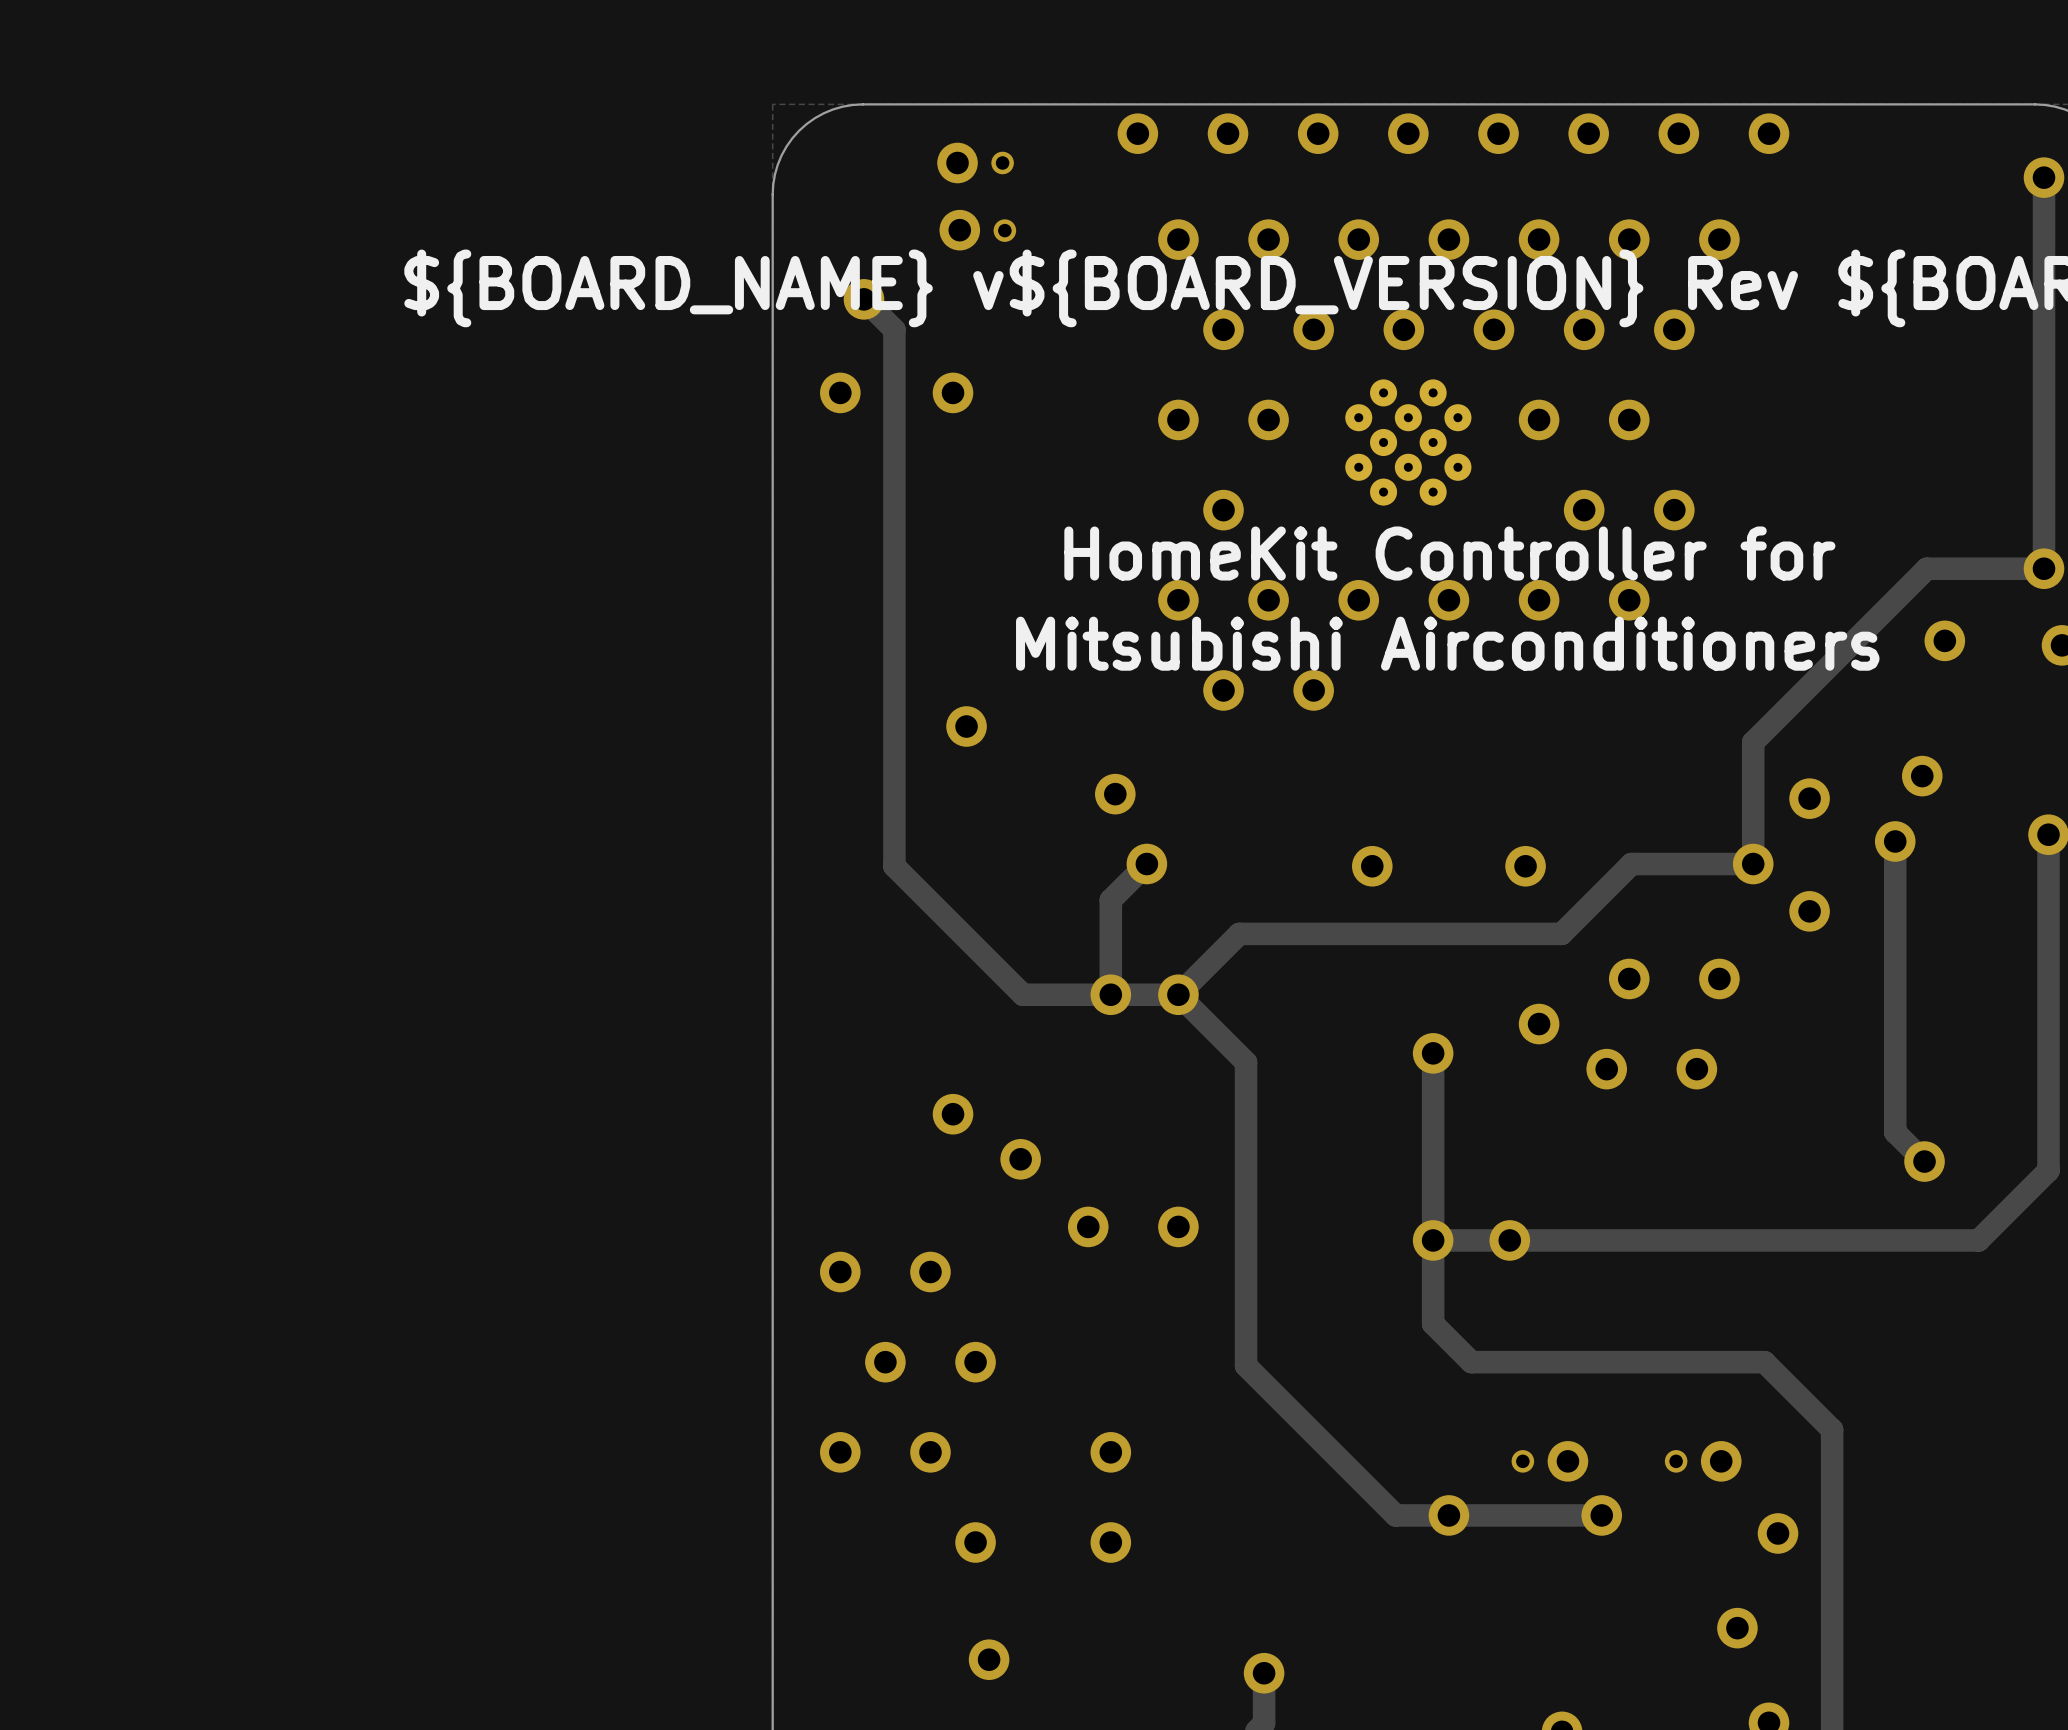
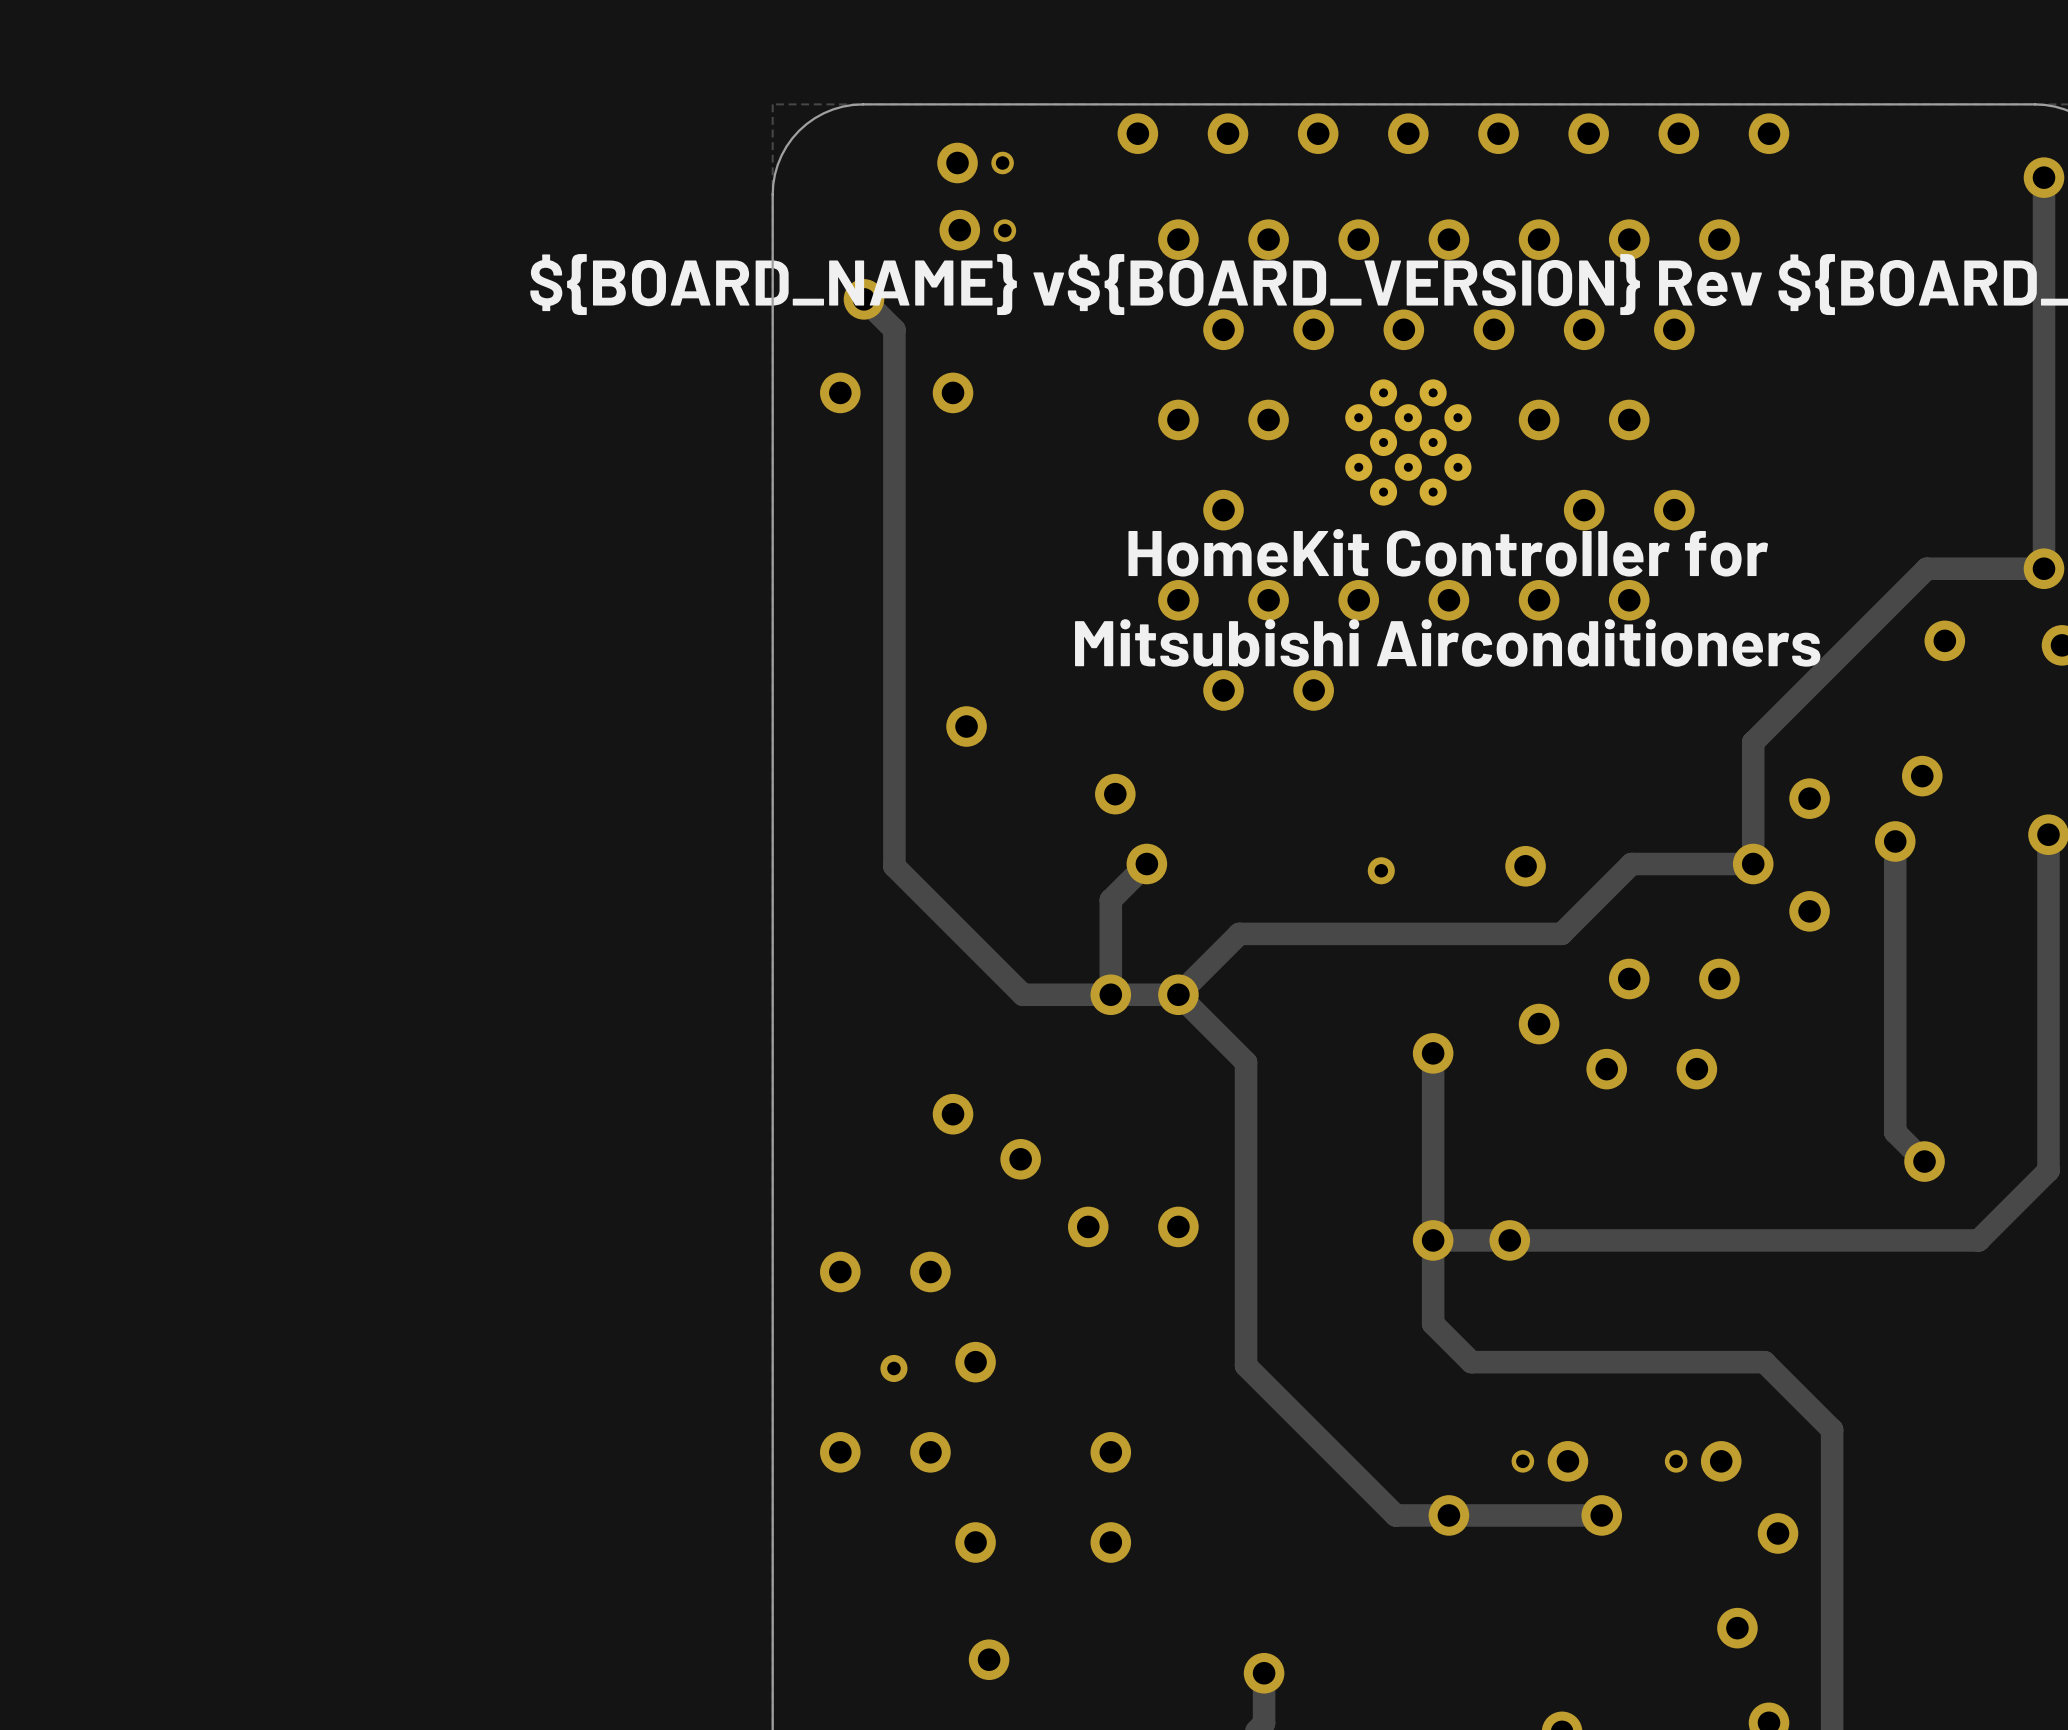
via size: [1351, 845, 1393, 887] -> [1367, 857, 1395, 885]
via size: [865, 1341, 906, 1383] -> [880, 1354, 908, 1383]

